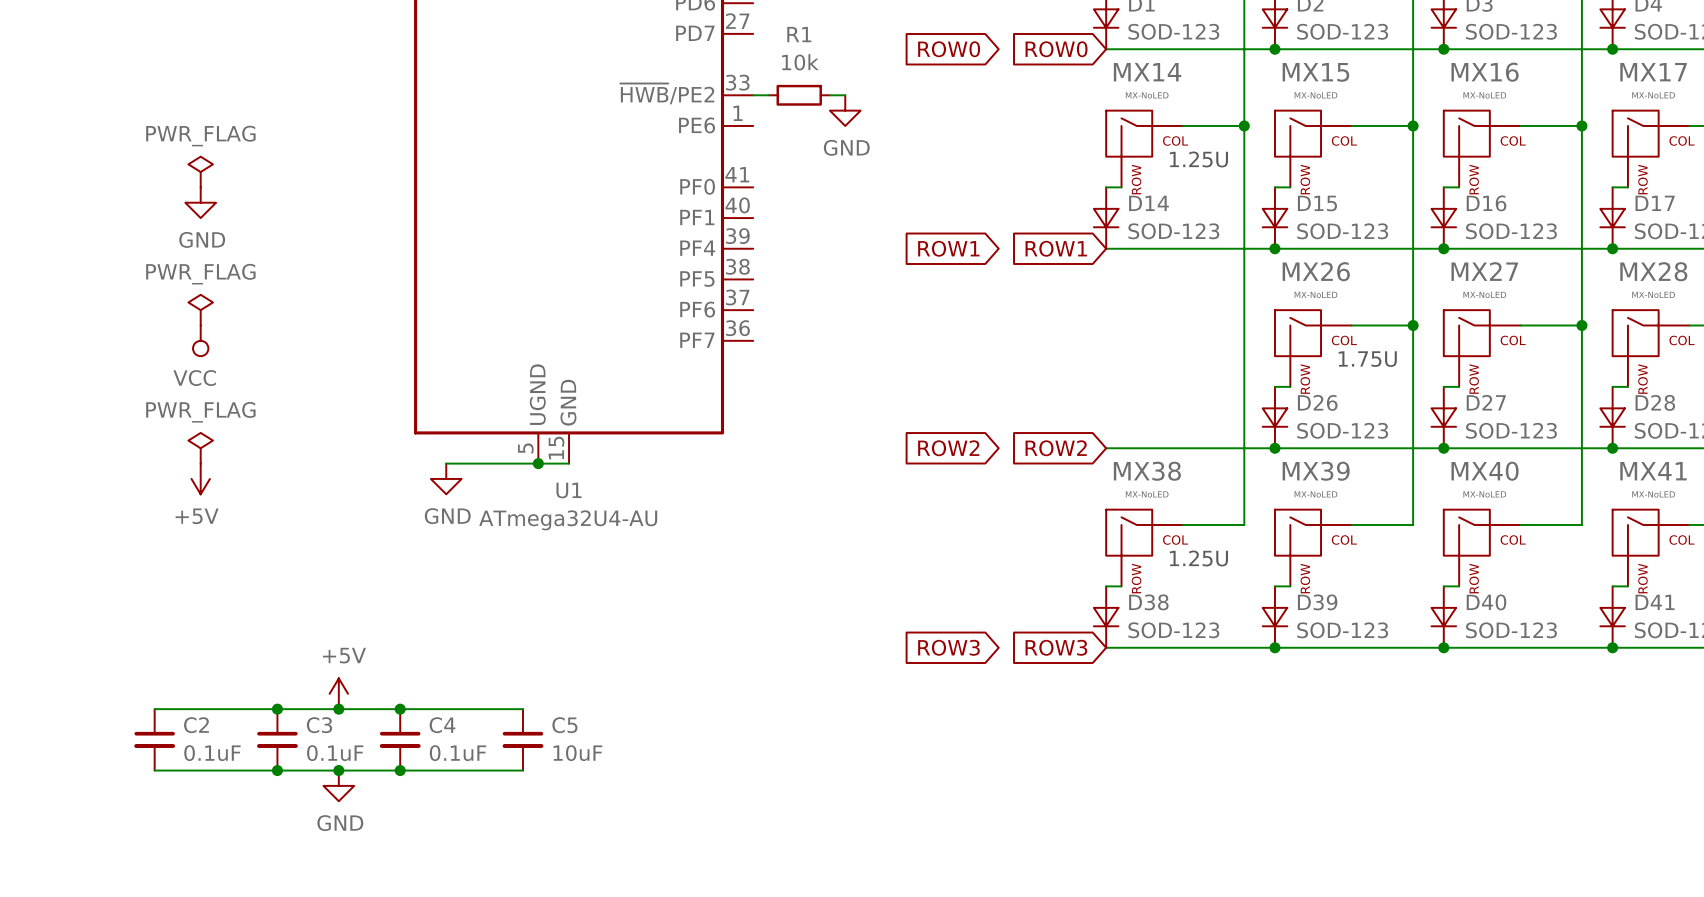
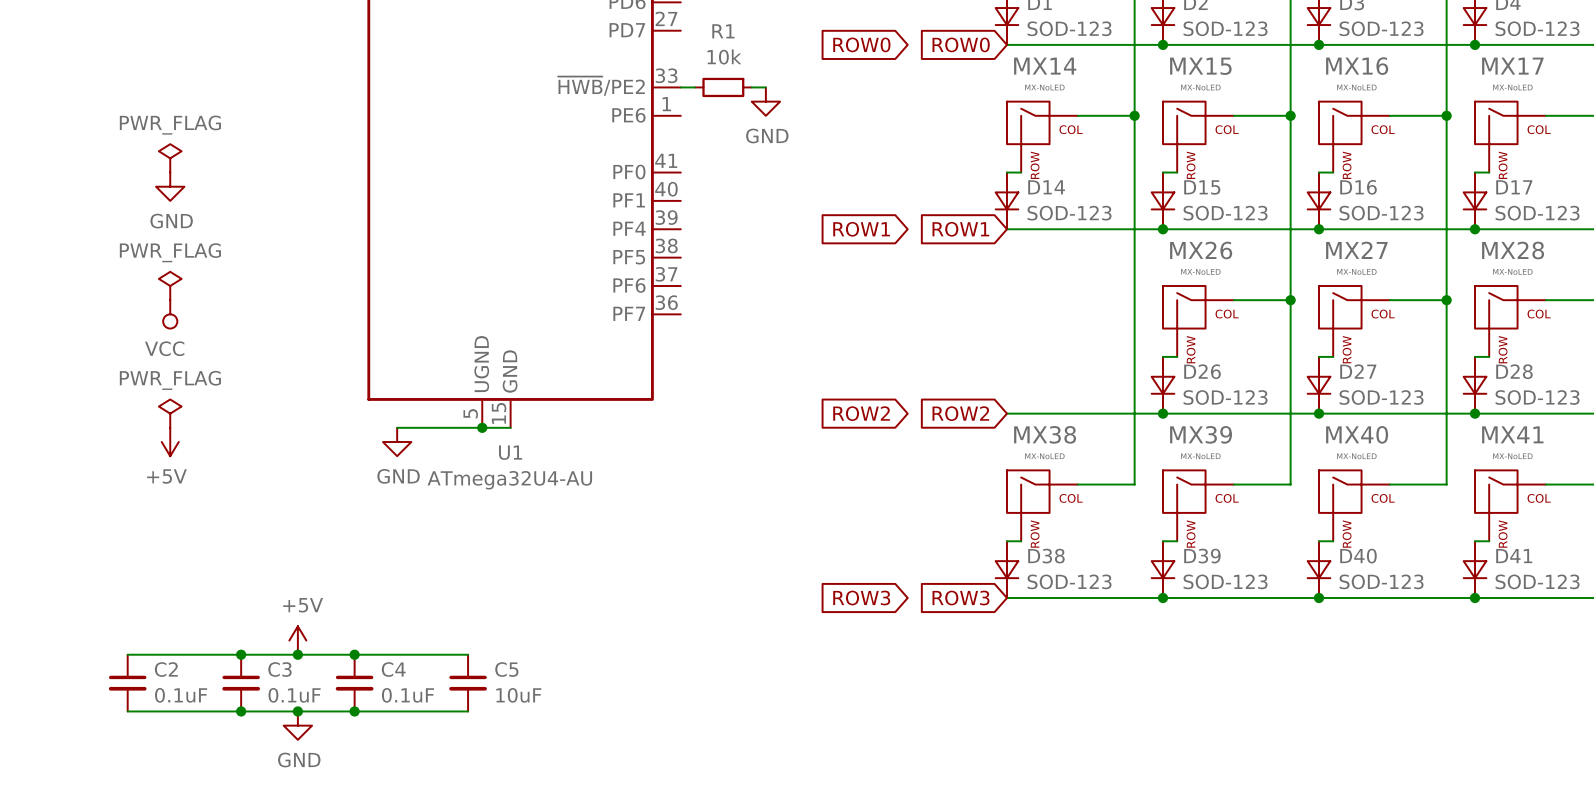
text: 1.25U (1198, 159) -> none
text: 1.75U (1367, 359) -> none
text: 1.25U (1198, 558) -> none

